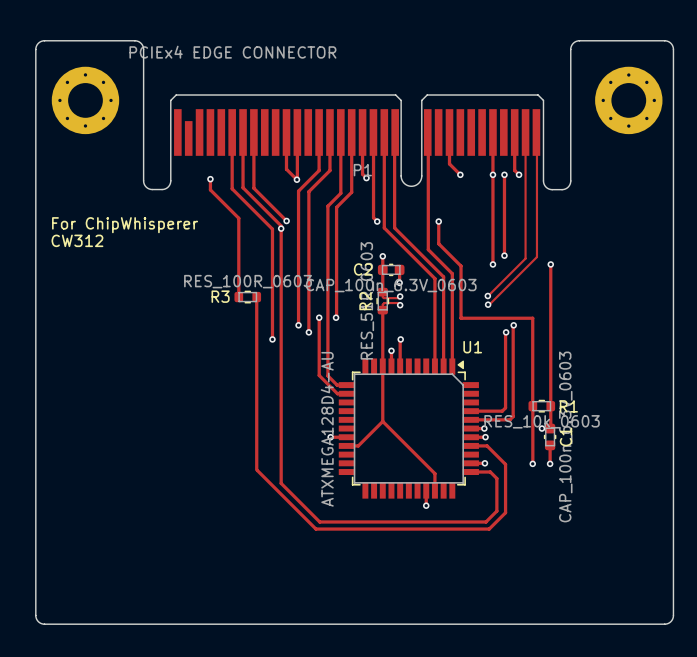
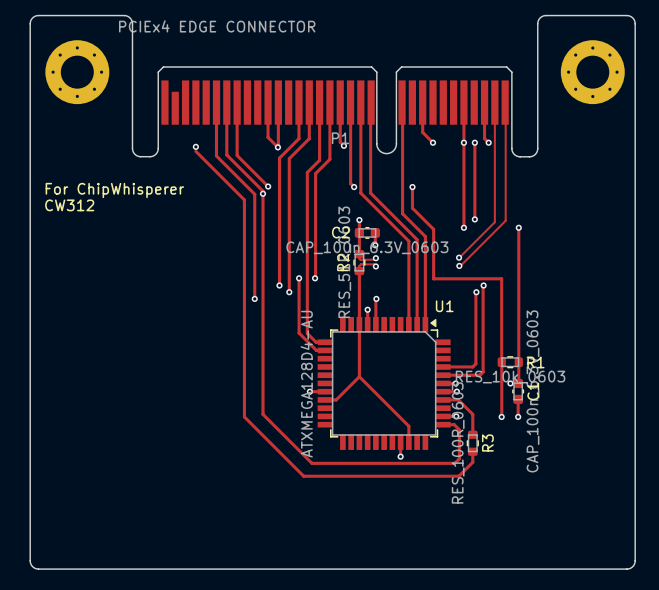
track: (210, 179) (210, 189) (238, 218) (238, 297) (237, 295) -> none
track: none -> (195, 151) (244, 199) (244, 416) (263, 435)
R3 value position: RES_100R_0603 (248, 281) -> RES_100R_0603 (458, 443)
R3 name position: R3 (220, 296) -> R3 (487, 443)
R3 rotation: 0° (247, 297) -> 90° clockwise (472, 443)
R3 position: (247, 297) -> (472, 443)
track: (256, 297) (256, 469) (315, 529) (489, 529) (505, 512) (505, 464) (502, 461) -> (472, 434) (472, 414)
track: (281, 461) (281, 483) -> (263, 414) (311, 463) (454, 463) (459, 458) (459, 429) (454, 424)
track: (482, 472) (490, 472) (496, 478) (496, 511) (486, 521) (319, 521) -> (472, 451) (472, 462) (458, 476) (303, 476) (299, 472)

